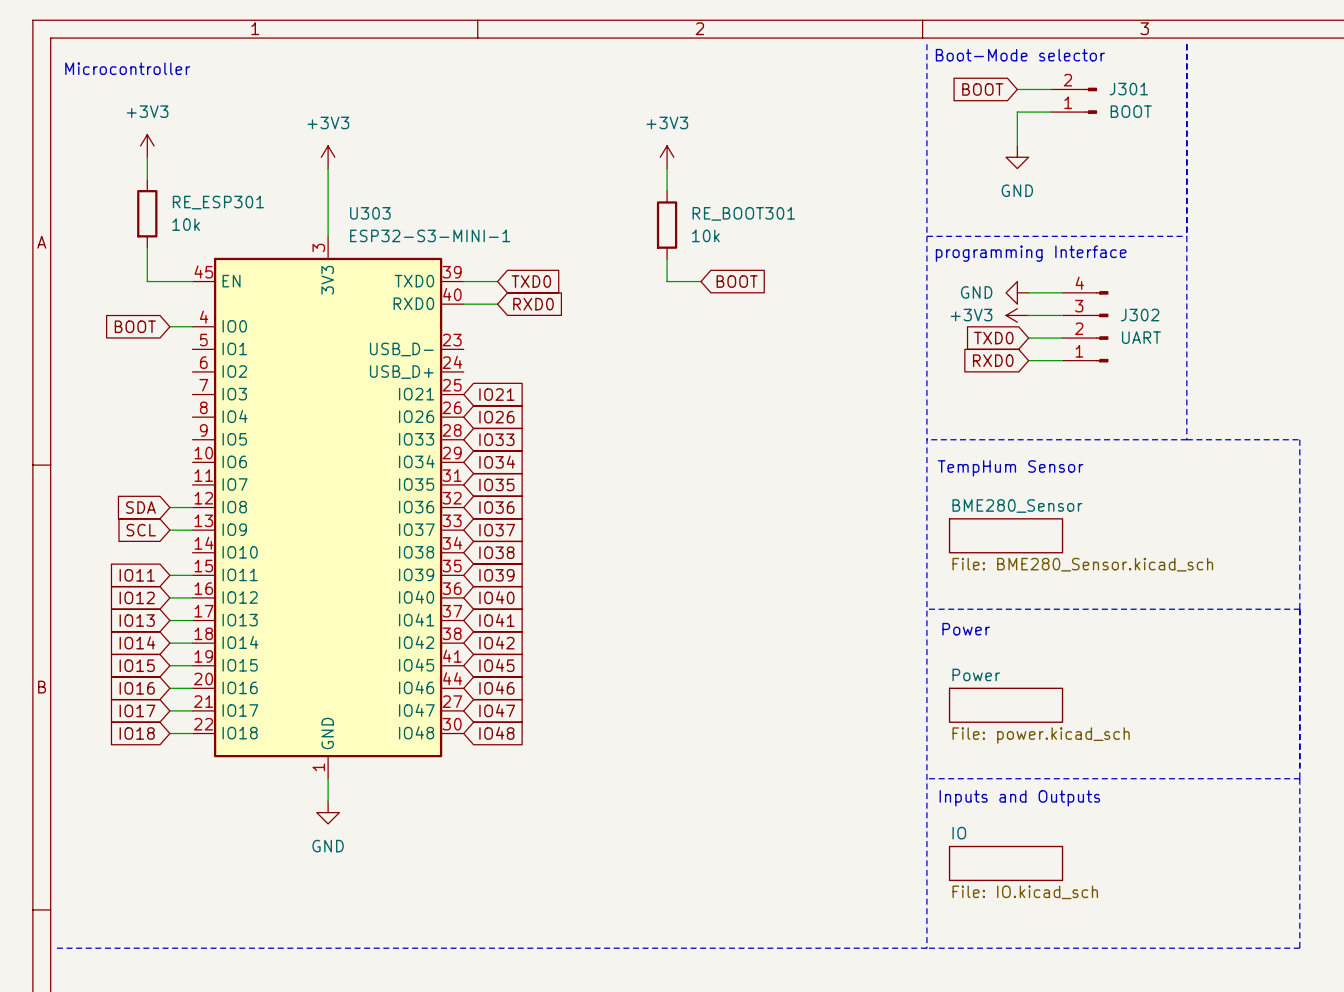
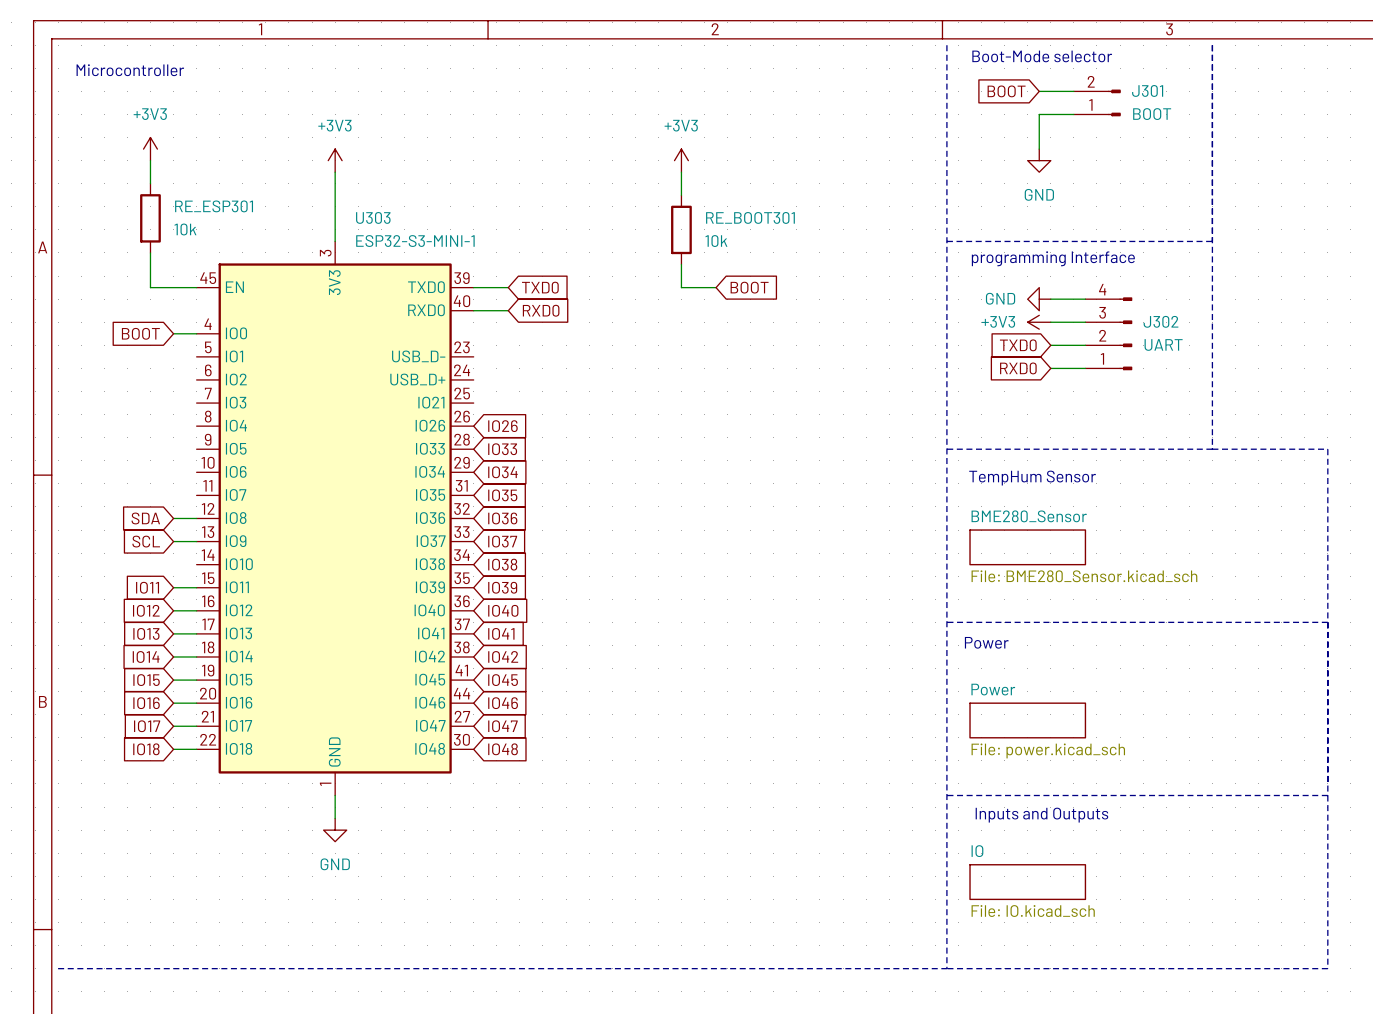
global label: IO21 (496, 394) -> none

